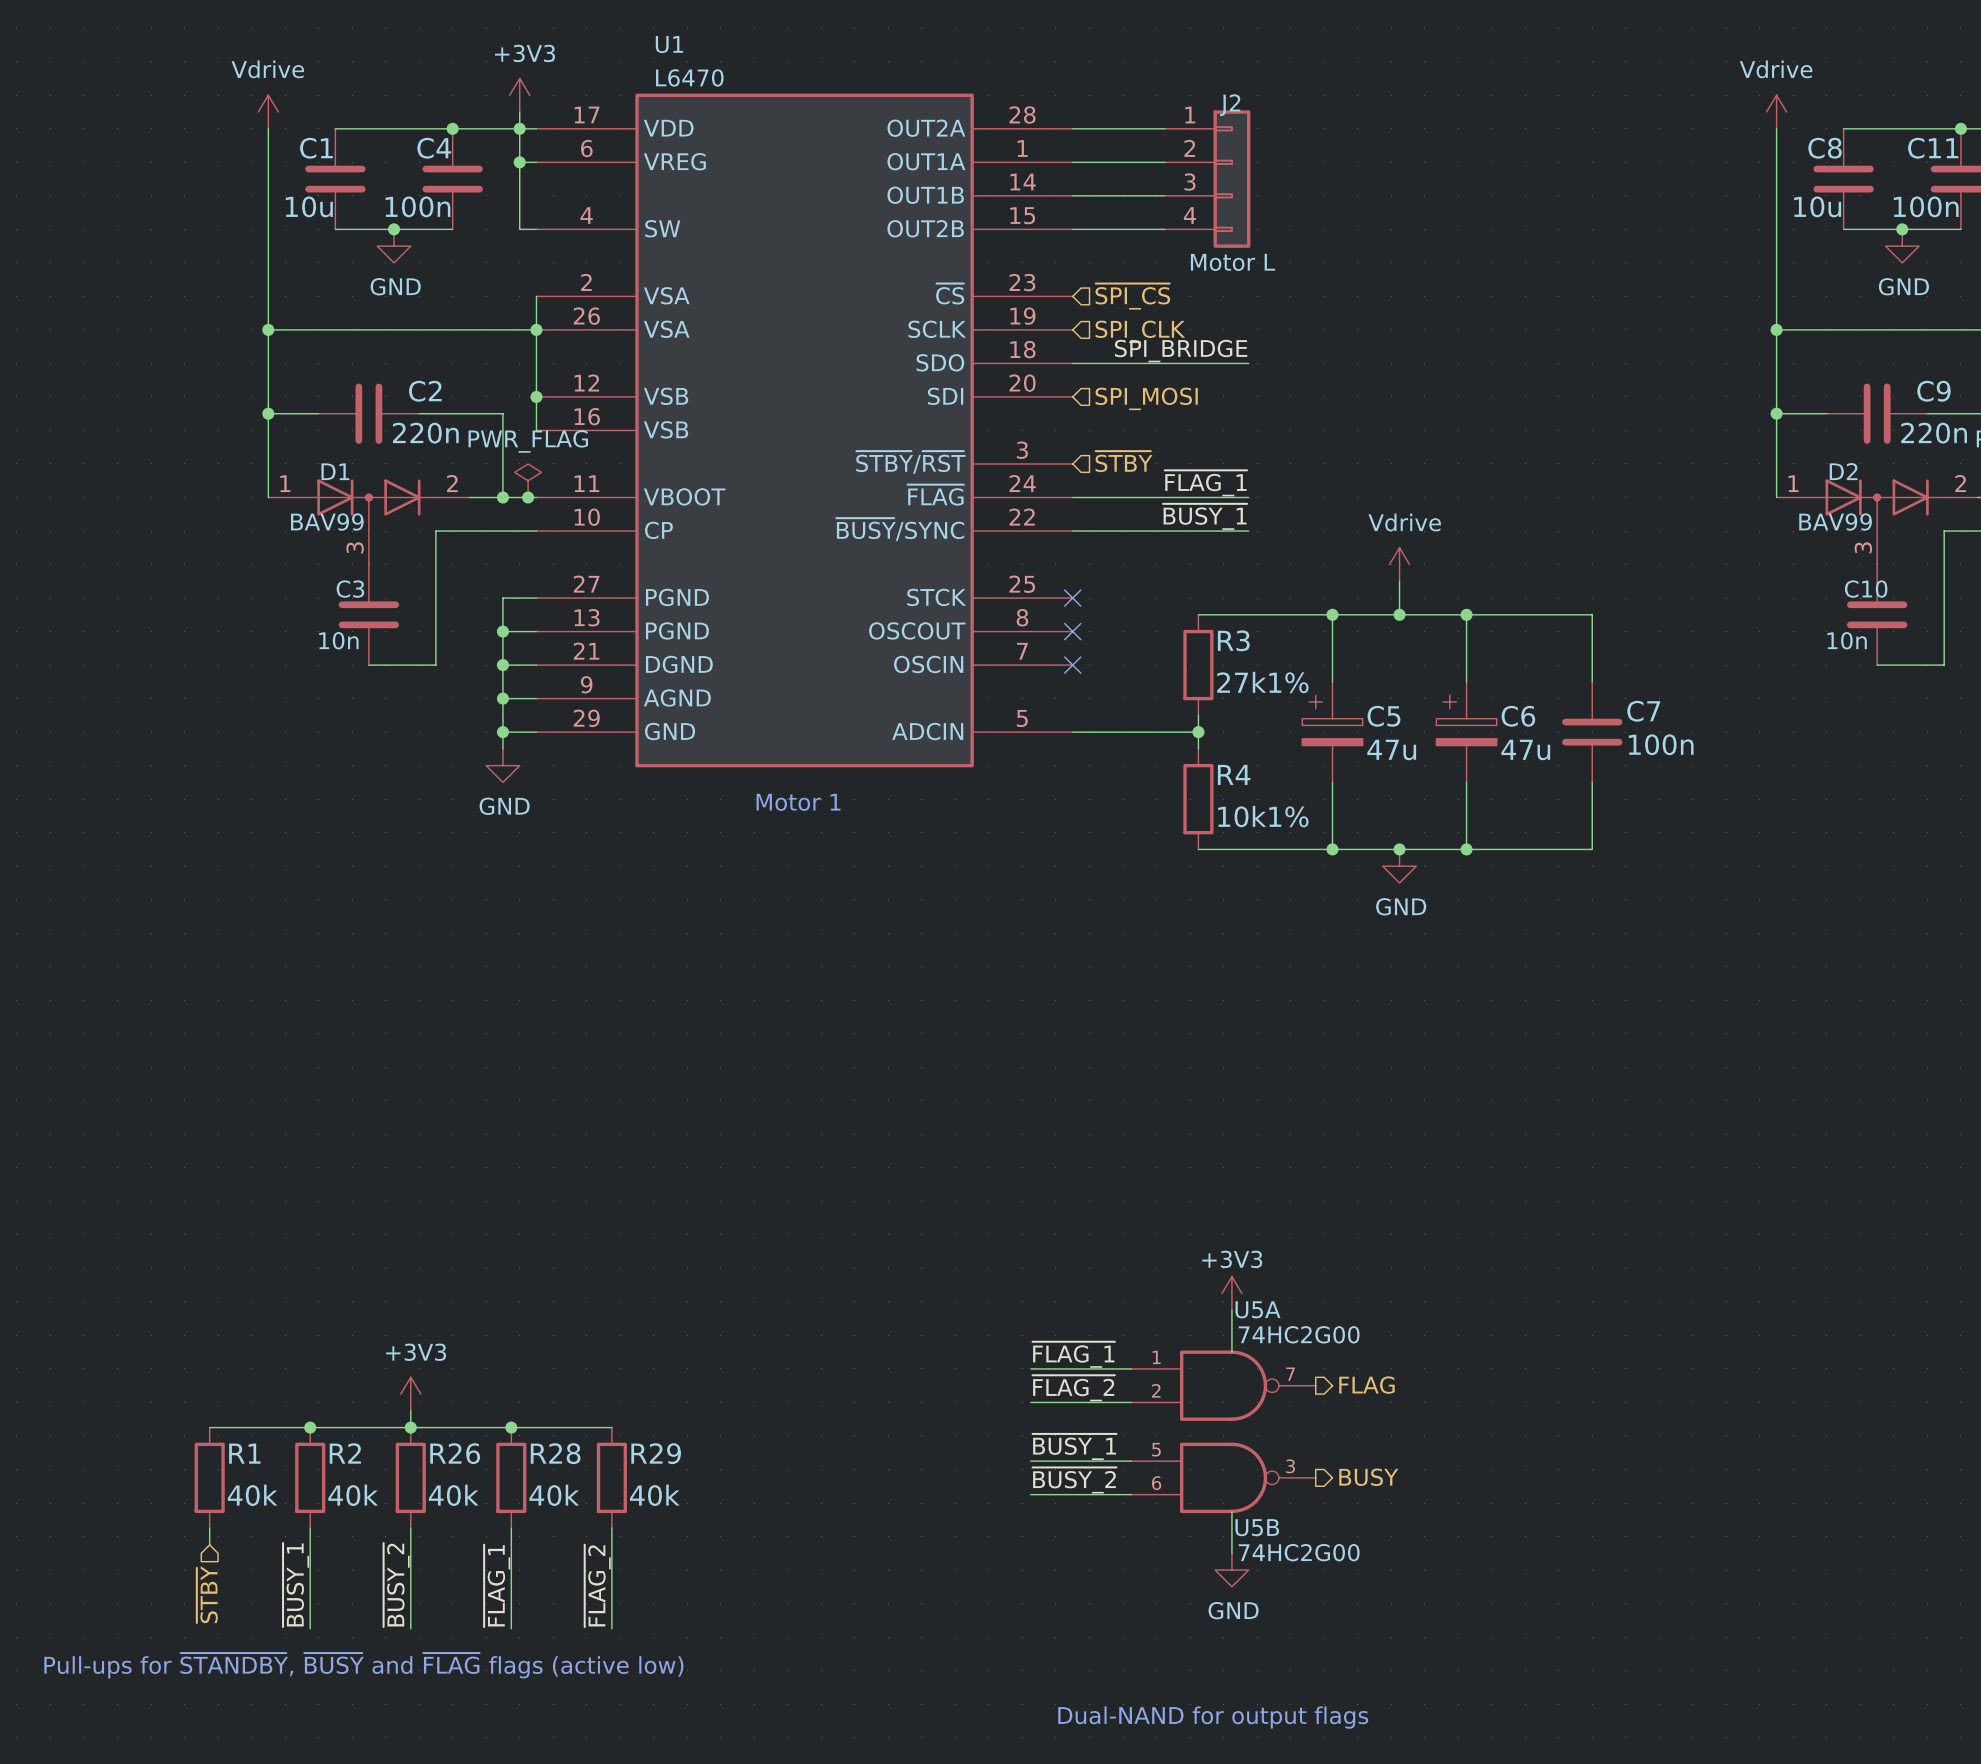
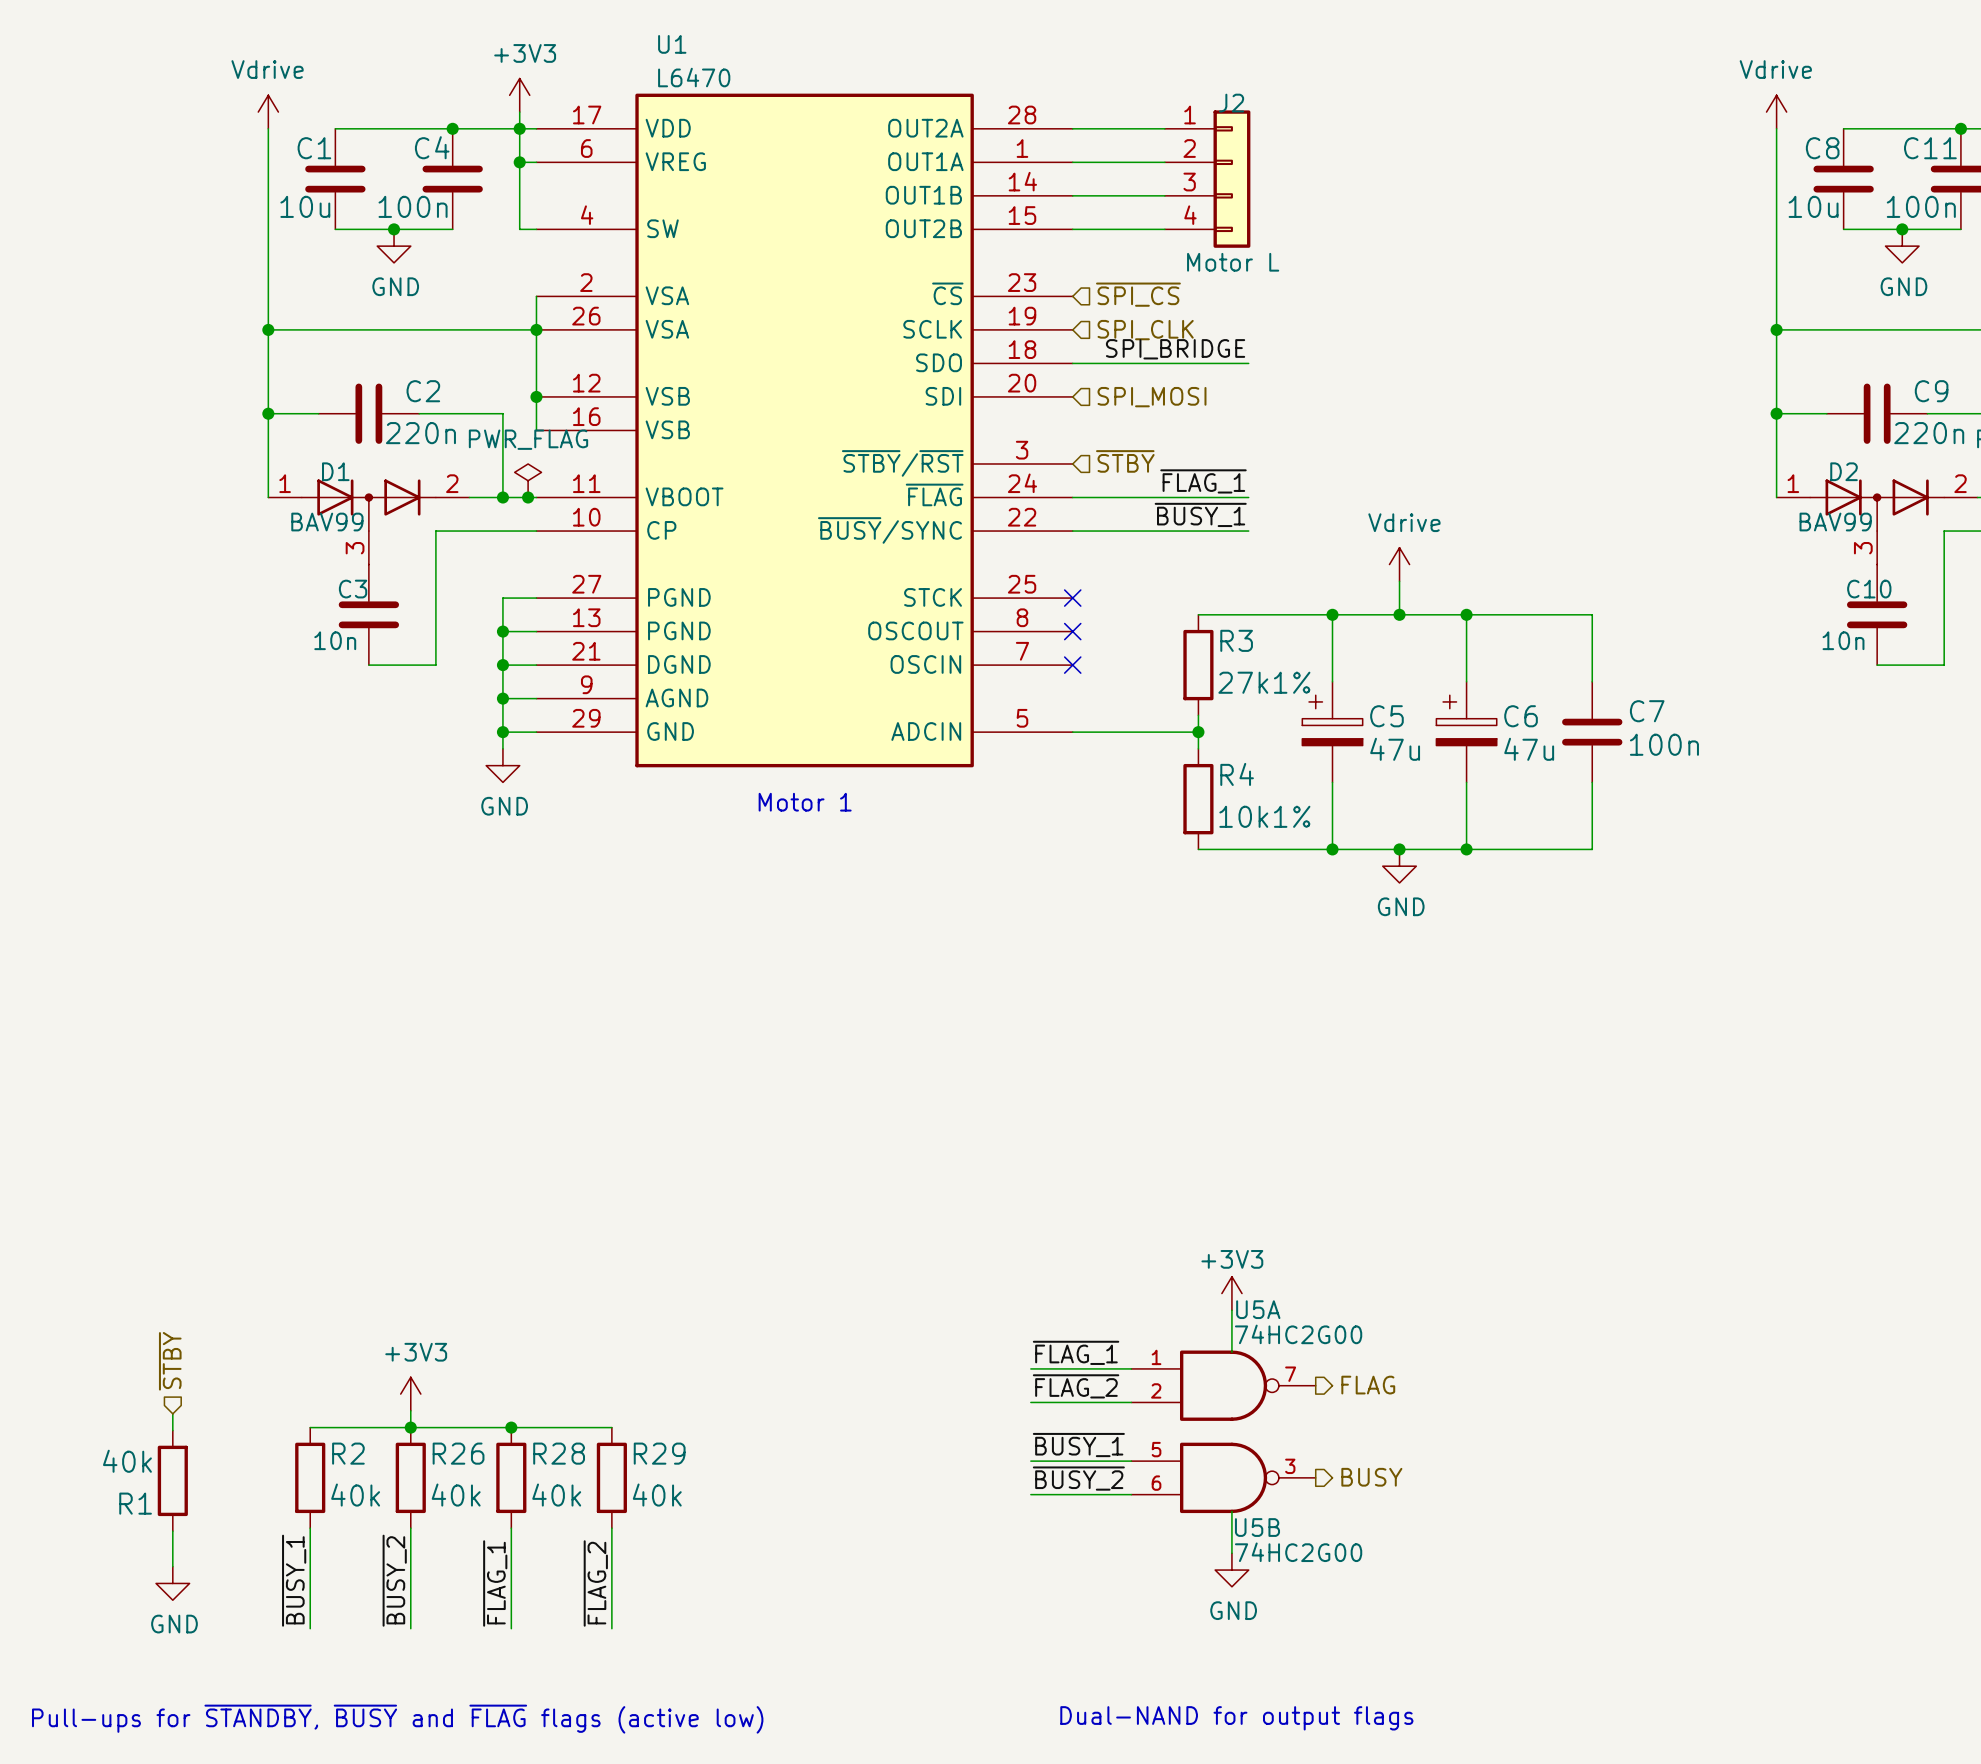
wire: (209, 1427) (310, 1427) -> none
junction: (310, 1427) -> none
R1 name position: R1 (244, 1453) -> R1 (135, 1503)
R1 position: (209, 1477) -> (172, 1480)
R1 value position: 40k (252, 1495) -> 40k (127, 1461)
wire: (209, 1528) (209, 1544) -> (172, 1413) (172, 1430)
wire: none -> (172, 1531) (172, 1566)
power symbol: none -> GND (172, 1583)
hierarchical label rotation: 0° (207, 1594) -> 180° (170, 1361)
hierarchical label position: ~{STBY} (207, 1594) -> ~{STBY} (170, 1361)
text position: Pull-ups for ~{STANDBY}, ~{BUSY} and ~{FLAG} flags (active low) (363, 1665) -> Pull-ups for ~{STANDBY}, ~{BUSY} and ~{FLAG} flags (active low) (397, 1719)

